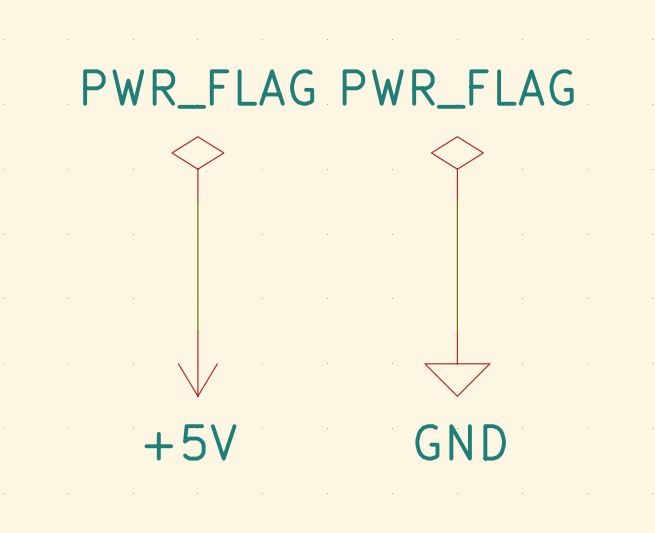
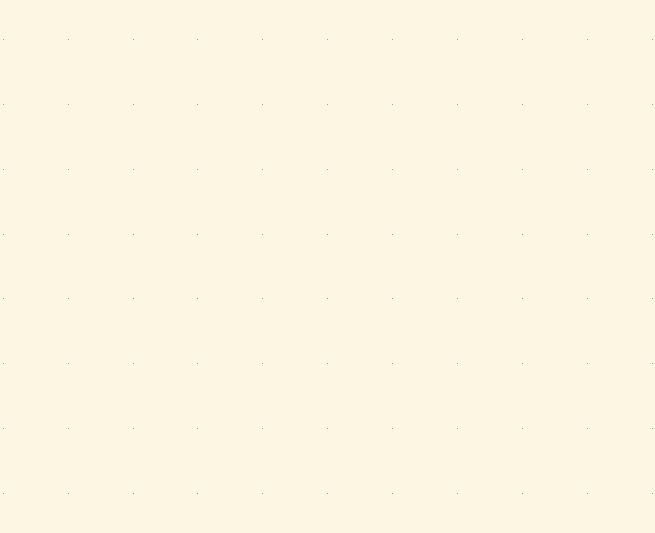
power symbol: PWR_FLAG (197, 169) -> none
power symbol: PWR_FLAG (457, 169) -> none
wire: (197, 201) (197, 331) -> none
wire: (457, 201) (457, 331) -> none
power symbol: +5V (197, 363) -> none
power symbol: GND (457, 363) -> none

